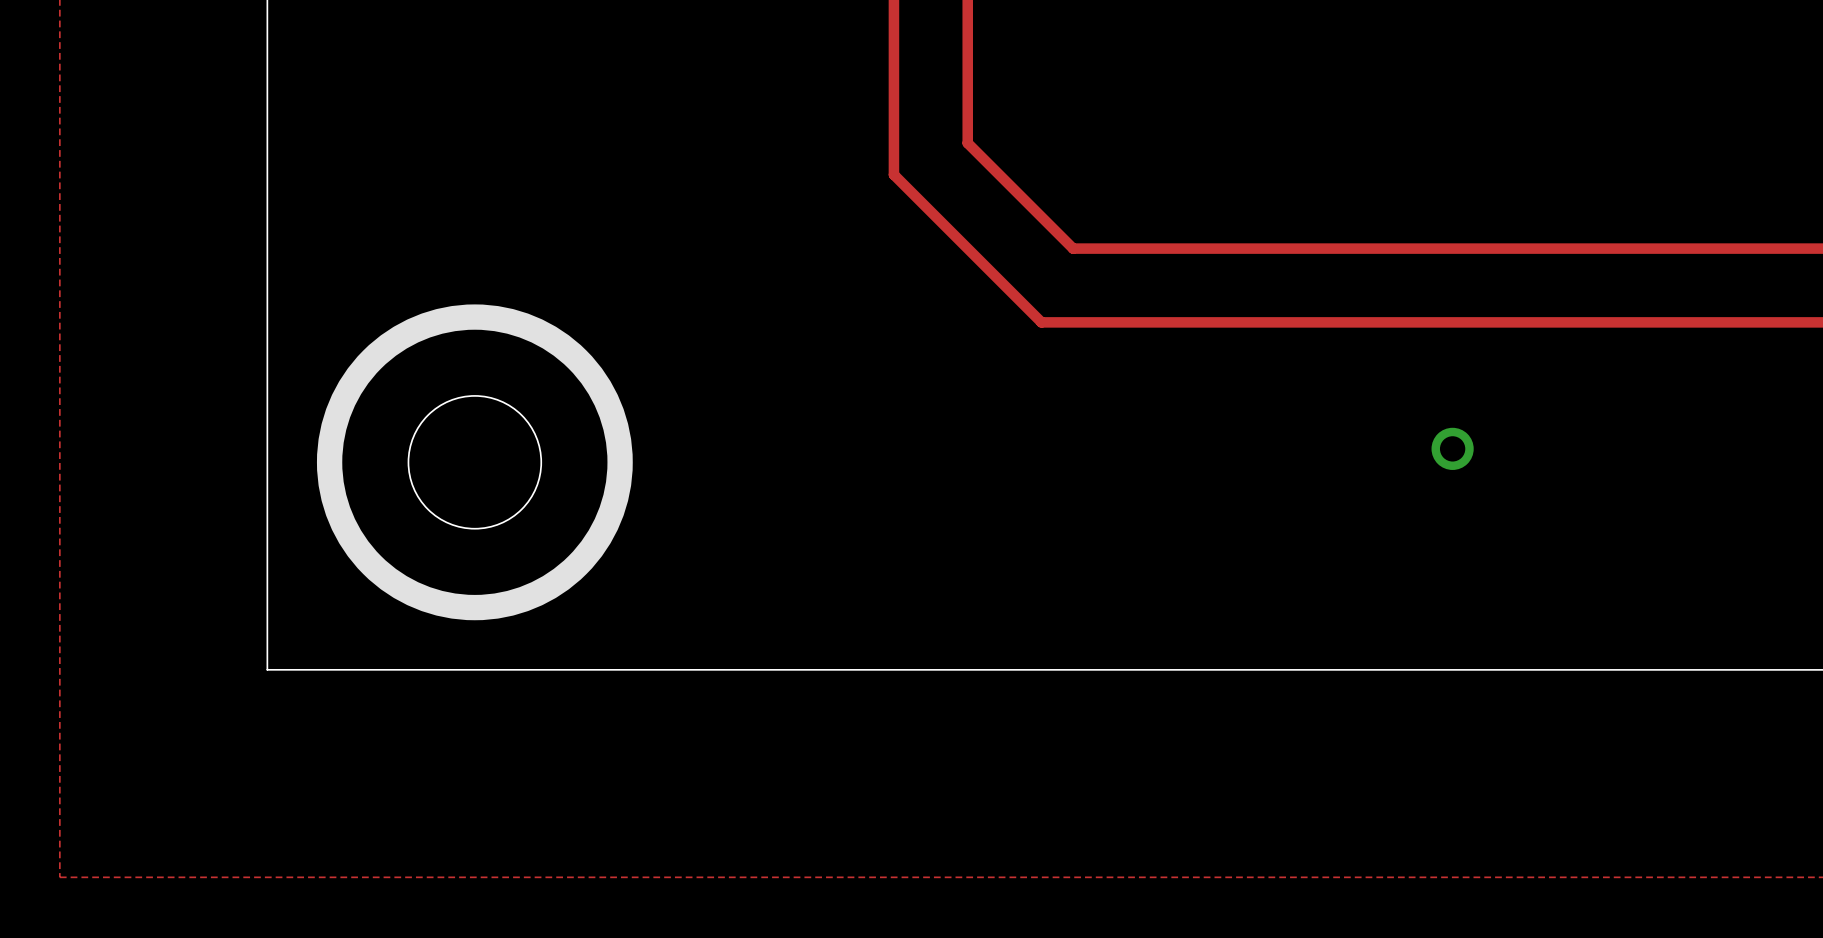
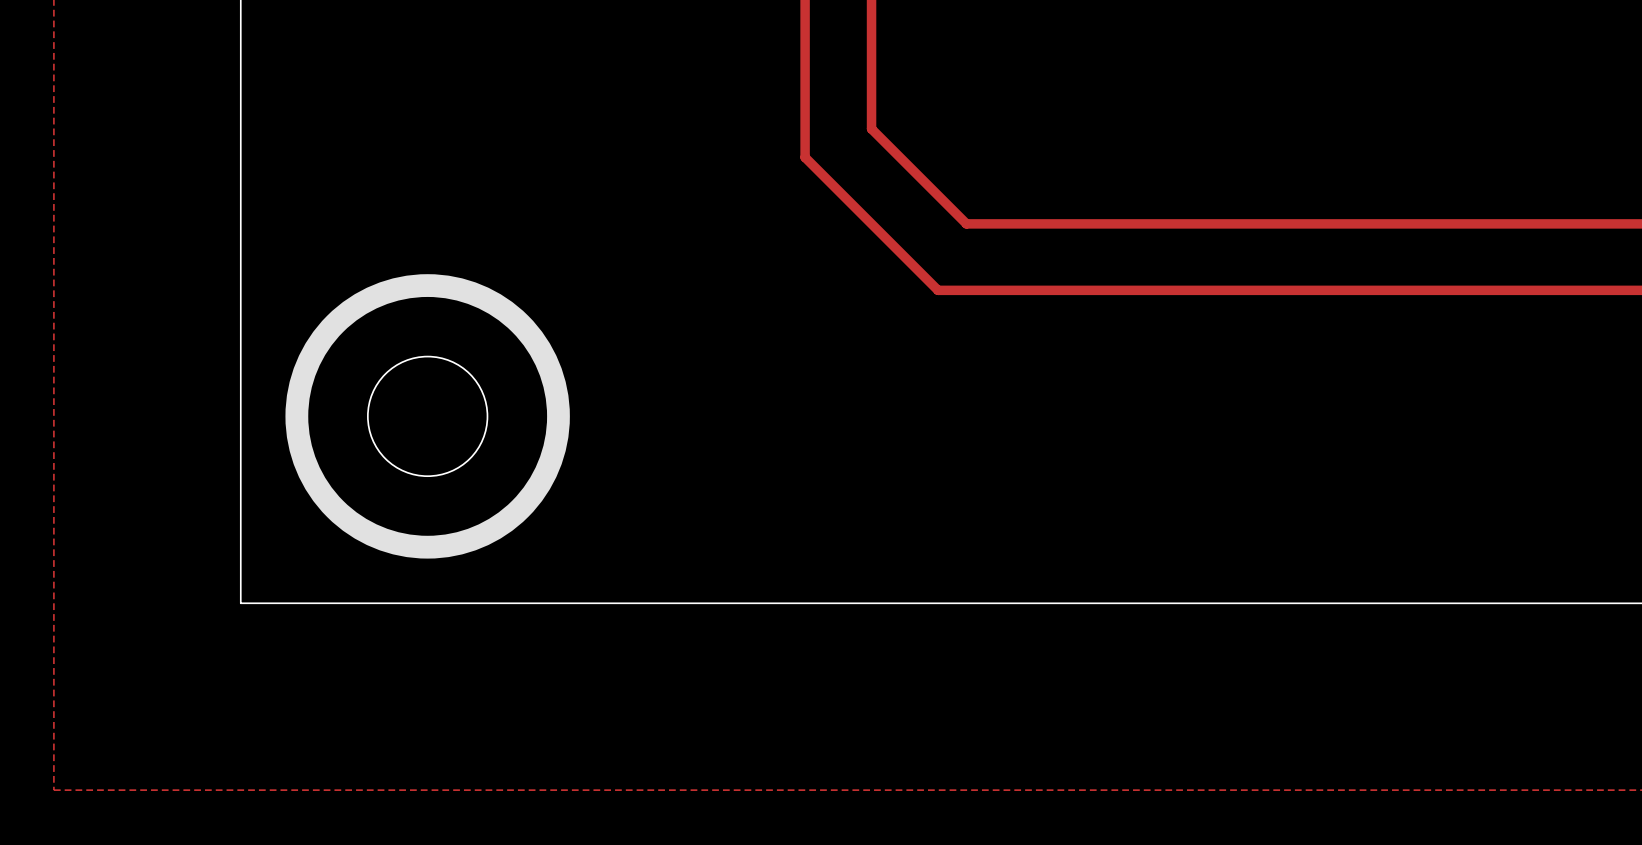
via: (1452, 448) -> none

